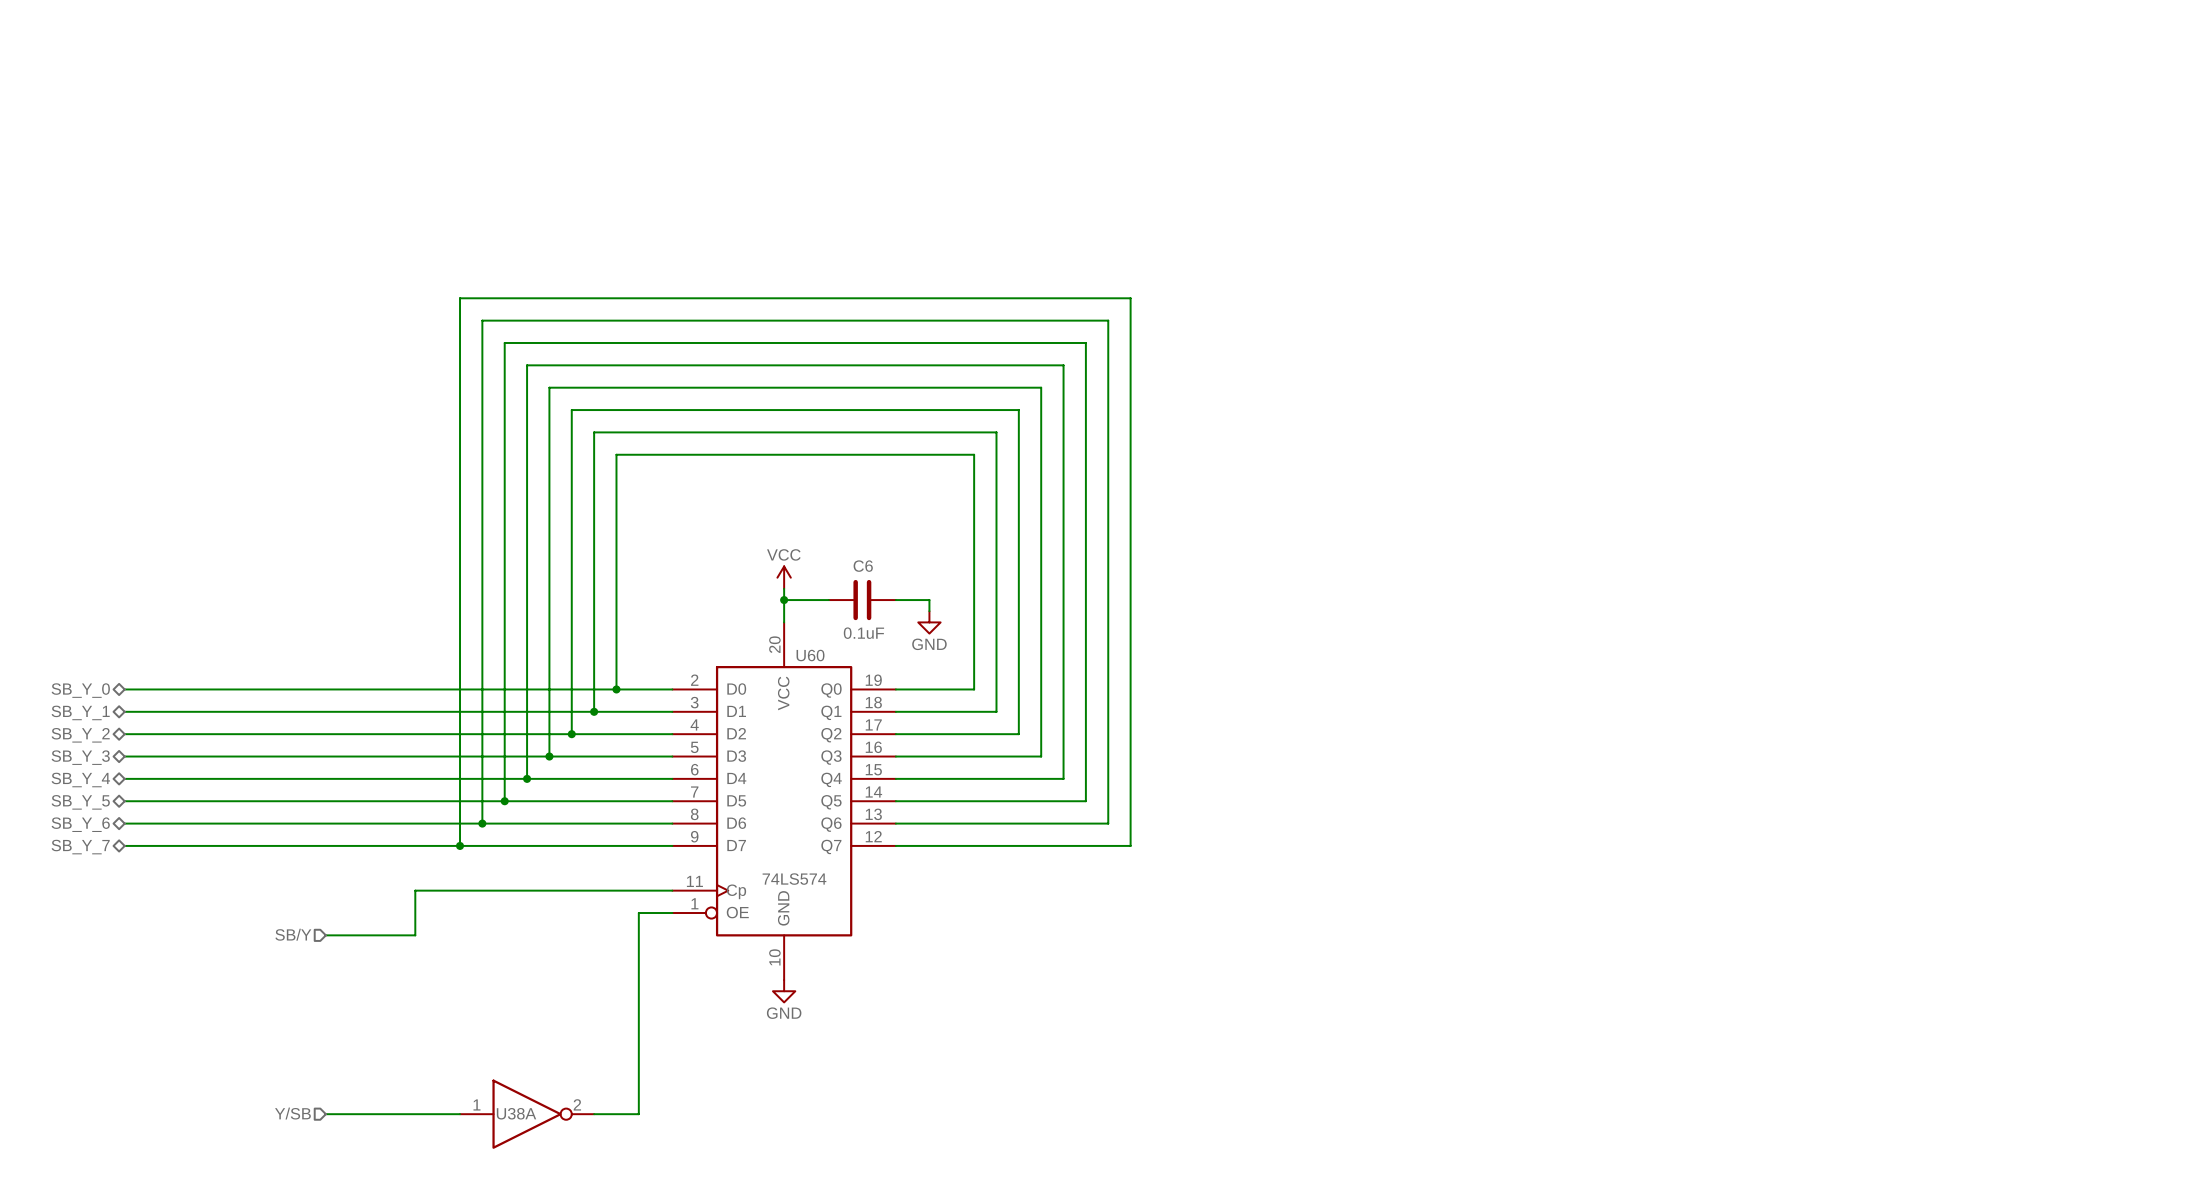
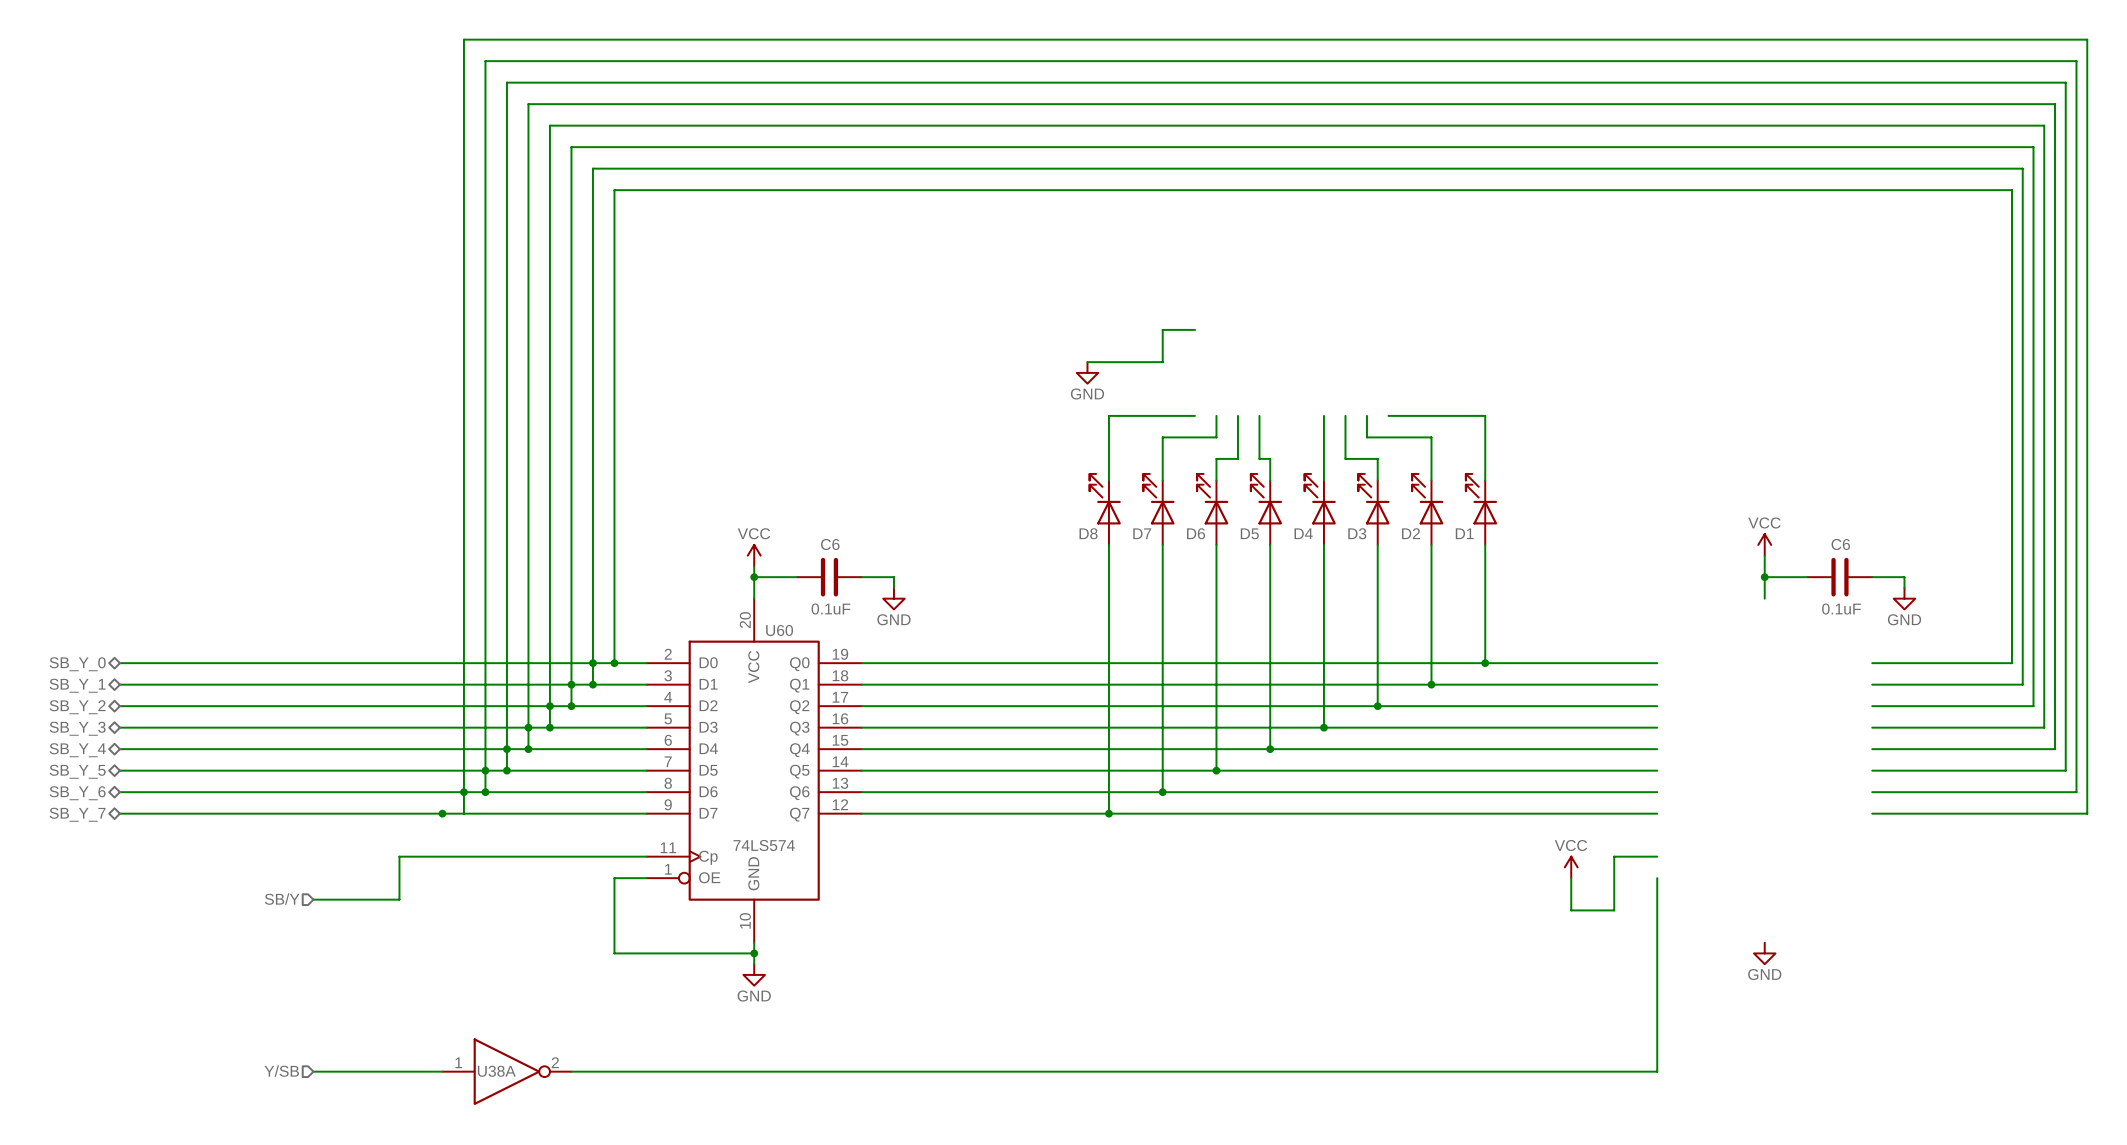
wire: (482, 320) (1108, 320) (1108, 823) -> (463, 308) (463, 39) (2087, 39) (2087, 813) (1872, 813)
wire: (504, 342) (1085, 342) (1085, 801) -> (485, 329) (485, 61) (2076, 61) (2076, 792) (1872, 792)
wire: none -> (1194, 329) (1162, 329) (1162, 362) (1087, 362)
wire: (527, 365) (1063, 365) (1063, 778) -> (506, 351) (506, 82) (2065, 82) (2065, 770) (1872, 770)
wire: (549, 387) (1041, 387) (1041, 756) -> (528, 372) (528, 104) (2054, 104) (2054, 749) (1872, 749)
power symbol: none -> GND (1087, 372)
wire: (571, 410) (1018, 410) (1018, 734) -> (549, 394) (549, 125) (2044, 125) (2044, 727) (1872, 727)
wire: (594, 432) (996, 432) (996, 711) -> (571, 415) (571, 147) (2033, 147) (2033, 706) (1872, 706)
wire: none -> (1194, 415) (1108, 415) (1108, 480)
wire: none -> (1216, 415) (1216, 437) (1162, 437) (1162, 480)
wire: none -> (1237, 415) (1237, 458) (1216, 458) (1216, 480)
wire: none -> (1259, 415) (1259, 458) (1270, 458) (1270, 480)
wire: none -> (1323, 415) (1323, 480)
wire: none -> (1345, 415) (1345, 458) (1377, 458) (1377, 480)
wire: none -> (1366, 415) (1366, 437) (1431, 437) (1431, 480)
wire: none -> (1388, 415) (1485, 415) (1485, 480)
wire: (616, 454) (974, 454) (974, 689) -> (592, 437) (592, 168) (2022, 168) (2022, 684) (1872, 684)
D8: none -> (1105, 509)
D7: none -> (1158, 509)
D6: none -> (1212, 509)
D5: none -> (1266, 509)
D4: none -> (1320, 509)
D3: none -> (1373, 509)
D2: none -> (1427, 509)
D1: none -> (1481, 509)
wire: none -> (1108, 544) (1108, 813)
wire: none -> (1162, 544) (1162, 792)
wire: none -> (1216, 544) (1216, 770)
wire: none -> (1270, 544) (1270, 749)
wire: none -> (1323, 544) (1323, 727)
wire: none -> (1377, 544) (1377, 706)
wire: none -> (1431, 544) (1431, 684)
wire: none -> (1485, 544) (1485, 663)
power symbol: none -> VCC (1764, 544)
wire: none -> (1764, 555) (1764, 598)
wire: none -> (1764, 577) (1807, 577)
junction: none -> (1764, 577)
C6: none -> 0.1uF (1839, 577)
wire: none -> (1872, 577) (1904, 577) (1904, 587)
power symbol: none -> GND (1904, 598)
wire: none -> (592, 663) (592, 684)
wire: none -> (614, 663) (614, 190) (2011, 190) (2011, 663) (1872, 663)
junction: none -> (614, 663)
wire: none -> (936, 663) (1657, 663)
junction: none -> (1485, 663)
wire: none -> (571, 684) (571, 706)
junction: none -> (592, 684)
wire: none -> (958, 684) (1657, 684)
junction: none -> (1431, 684)
wire: none -> (549, 706) (549, 727)
junction: none -> (571, 706)
wire: none -> (979, 706) (1657, 706)
junction: none -> (1377, 706)
wire: none -> (528, 727) (528, 749)
junction: none -> (549, 727)
wire: none -> (1001, 727) (1657, 727)
junction: none -> (1323, 727)
wire: none -> (506, 749) (506, 770)
junction: none -> (528, 749)
wire: none -> (1022, 749) (1657, 749)
junction: none -> (1270, 749)
wire: none -> (485, 770) (485, 792)
junction: none -> (506, 770)
wire: none -> (1044, 770) (1657, 770)
junction: none -> (1216, 770)
wire: none -> (463, 792) (463, 813)
junction: none -> (485, 792)
wire: none -> (1065, 792) (1657, 792)
junction: none -> (1162, 792)
wire: (460, 845) (460, 298) (1130, 298) (1130, 845) -> (1657, 813) (1087, 813)
junction: none -> (1108, 813)
wire: none -> (1657, 856) (1614, 856) (1614, 910) (1571, 910) (1571, 878)
power symbol: none -> VCC (1571, 867)
wire: none -> (1657, 878) (1657, 1071) (614, 1071)
wire: (638, 991) (638, 1114) -> (614, 953) (754, 953)
power symbol position: GND (784, 991) -> GND (754, 974)
junction: none -> (754, 953)
power symbol: none -> GND (1764, 953)

